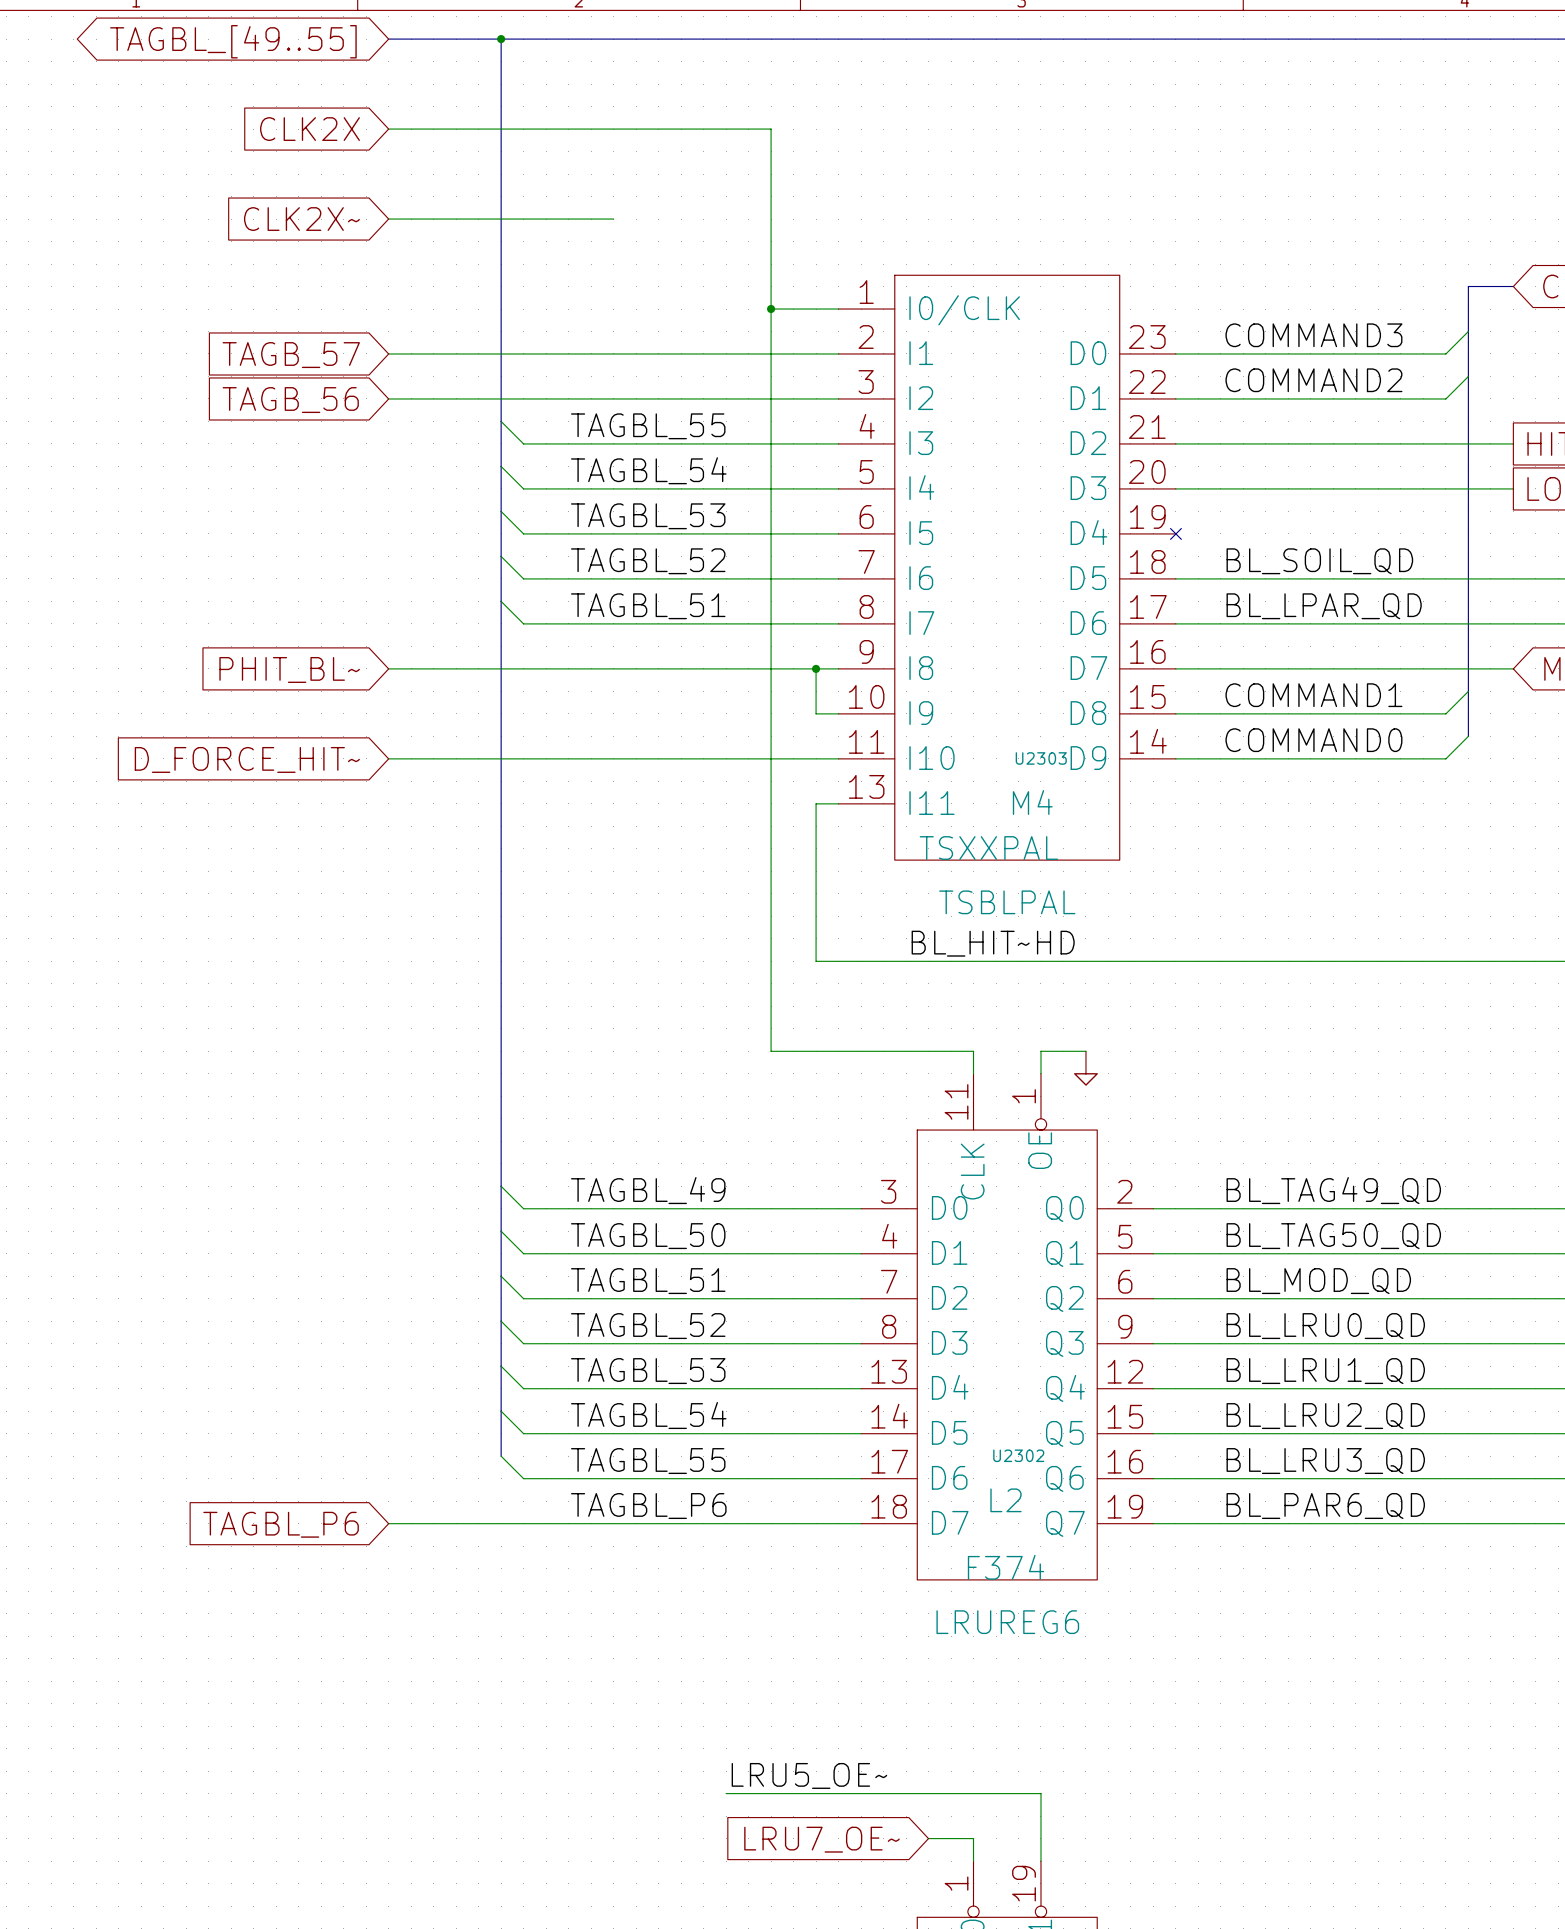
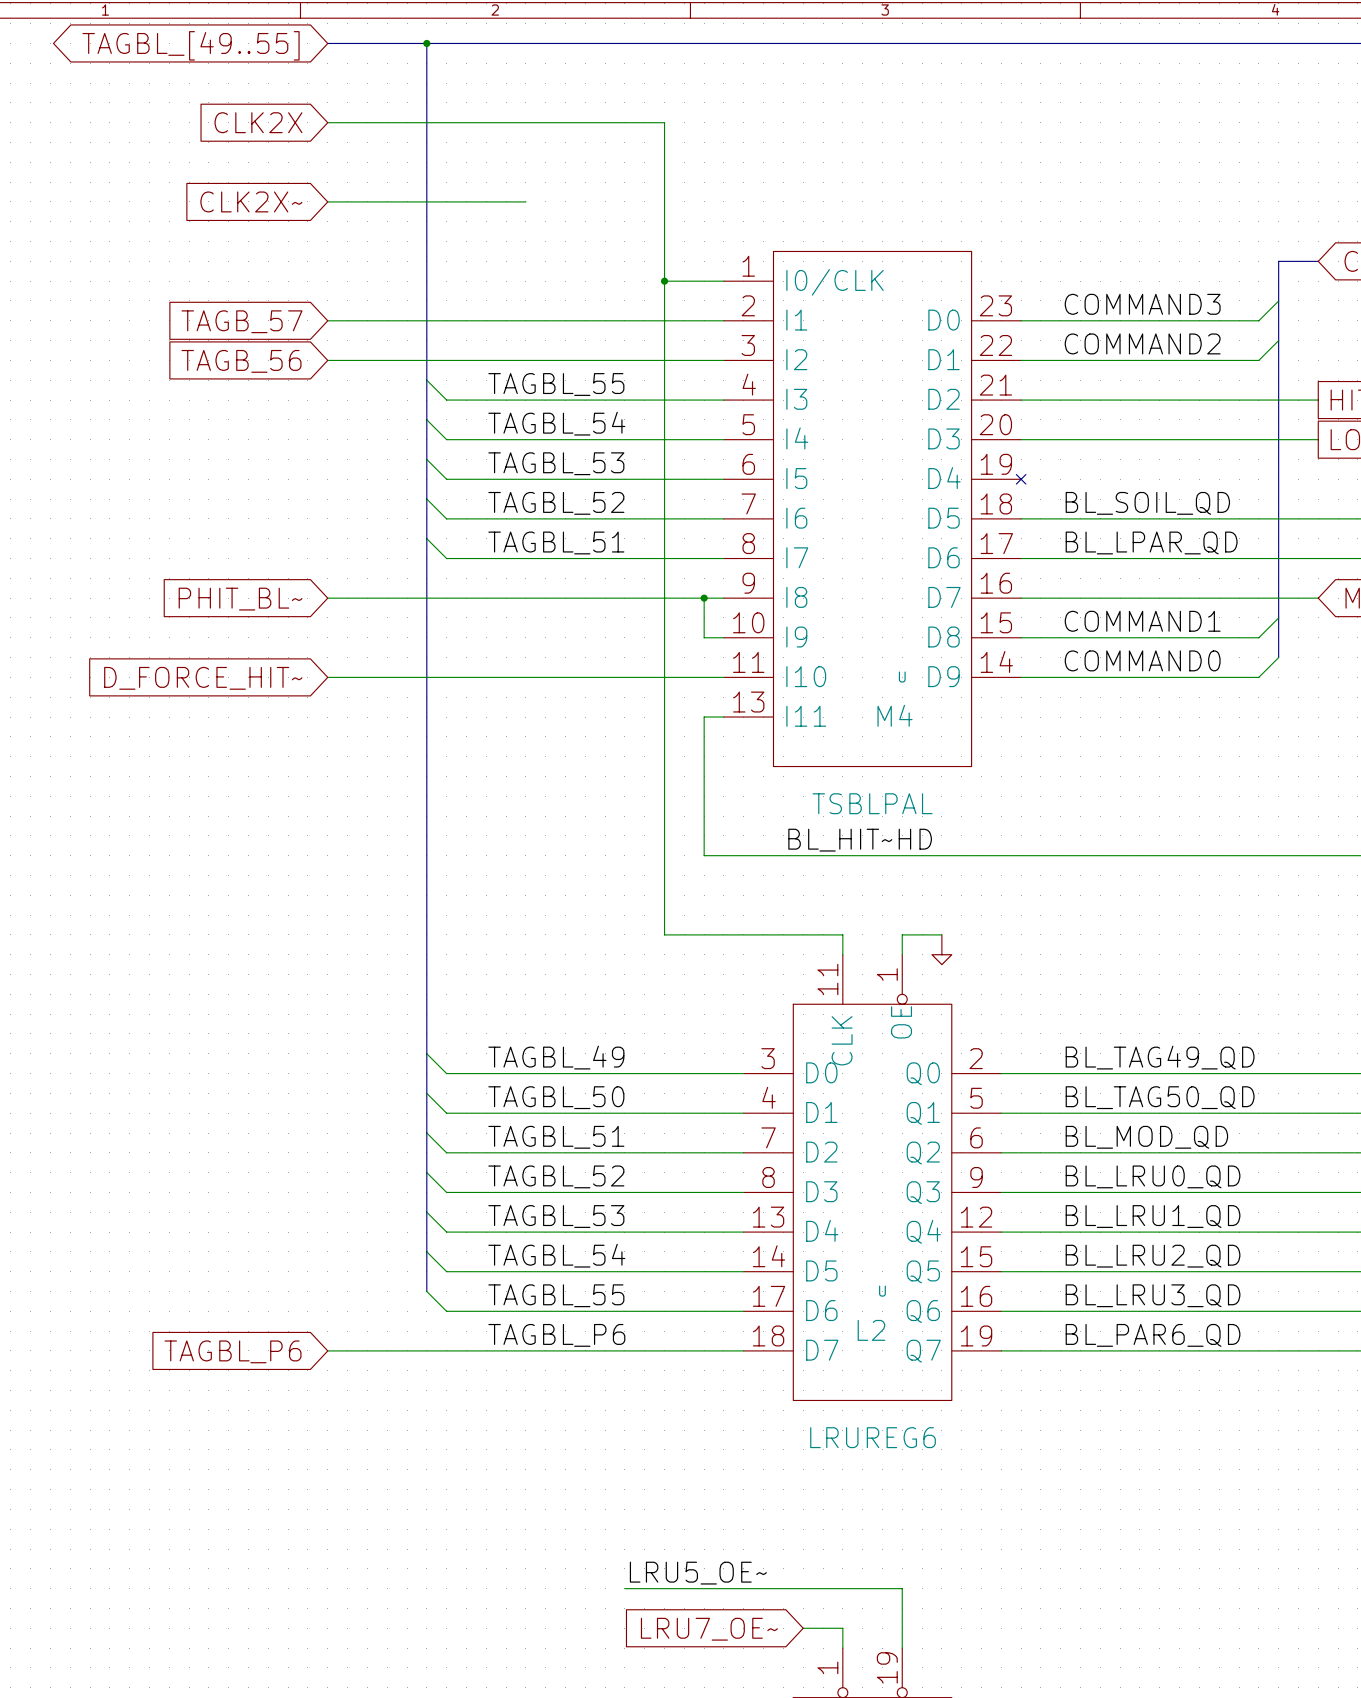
U2303 name: U2303 (1041, 758) -> U (902, 677)
U2303 value: TSXXPAL (988, 848) -> none
U2302 name: U2302 (1018, 1455) -> U (882, 1291)
U2302 value: F374 (1006, 1567) -> none

